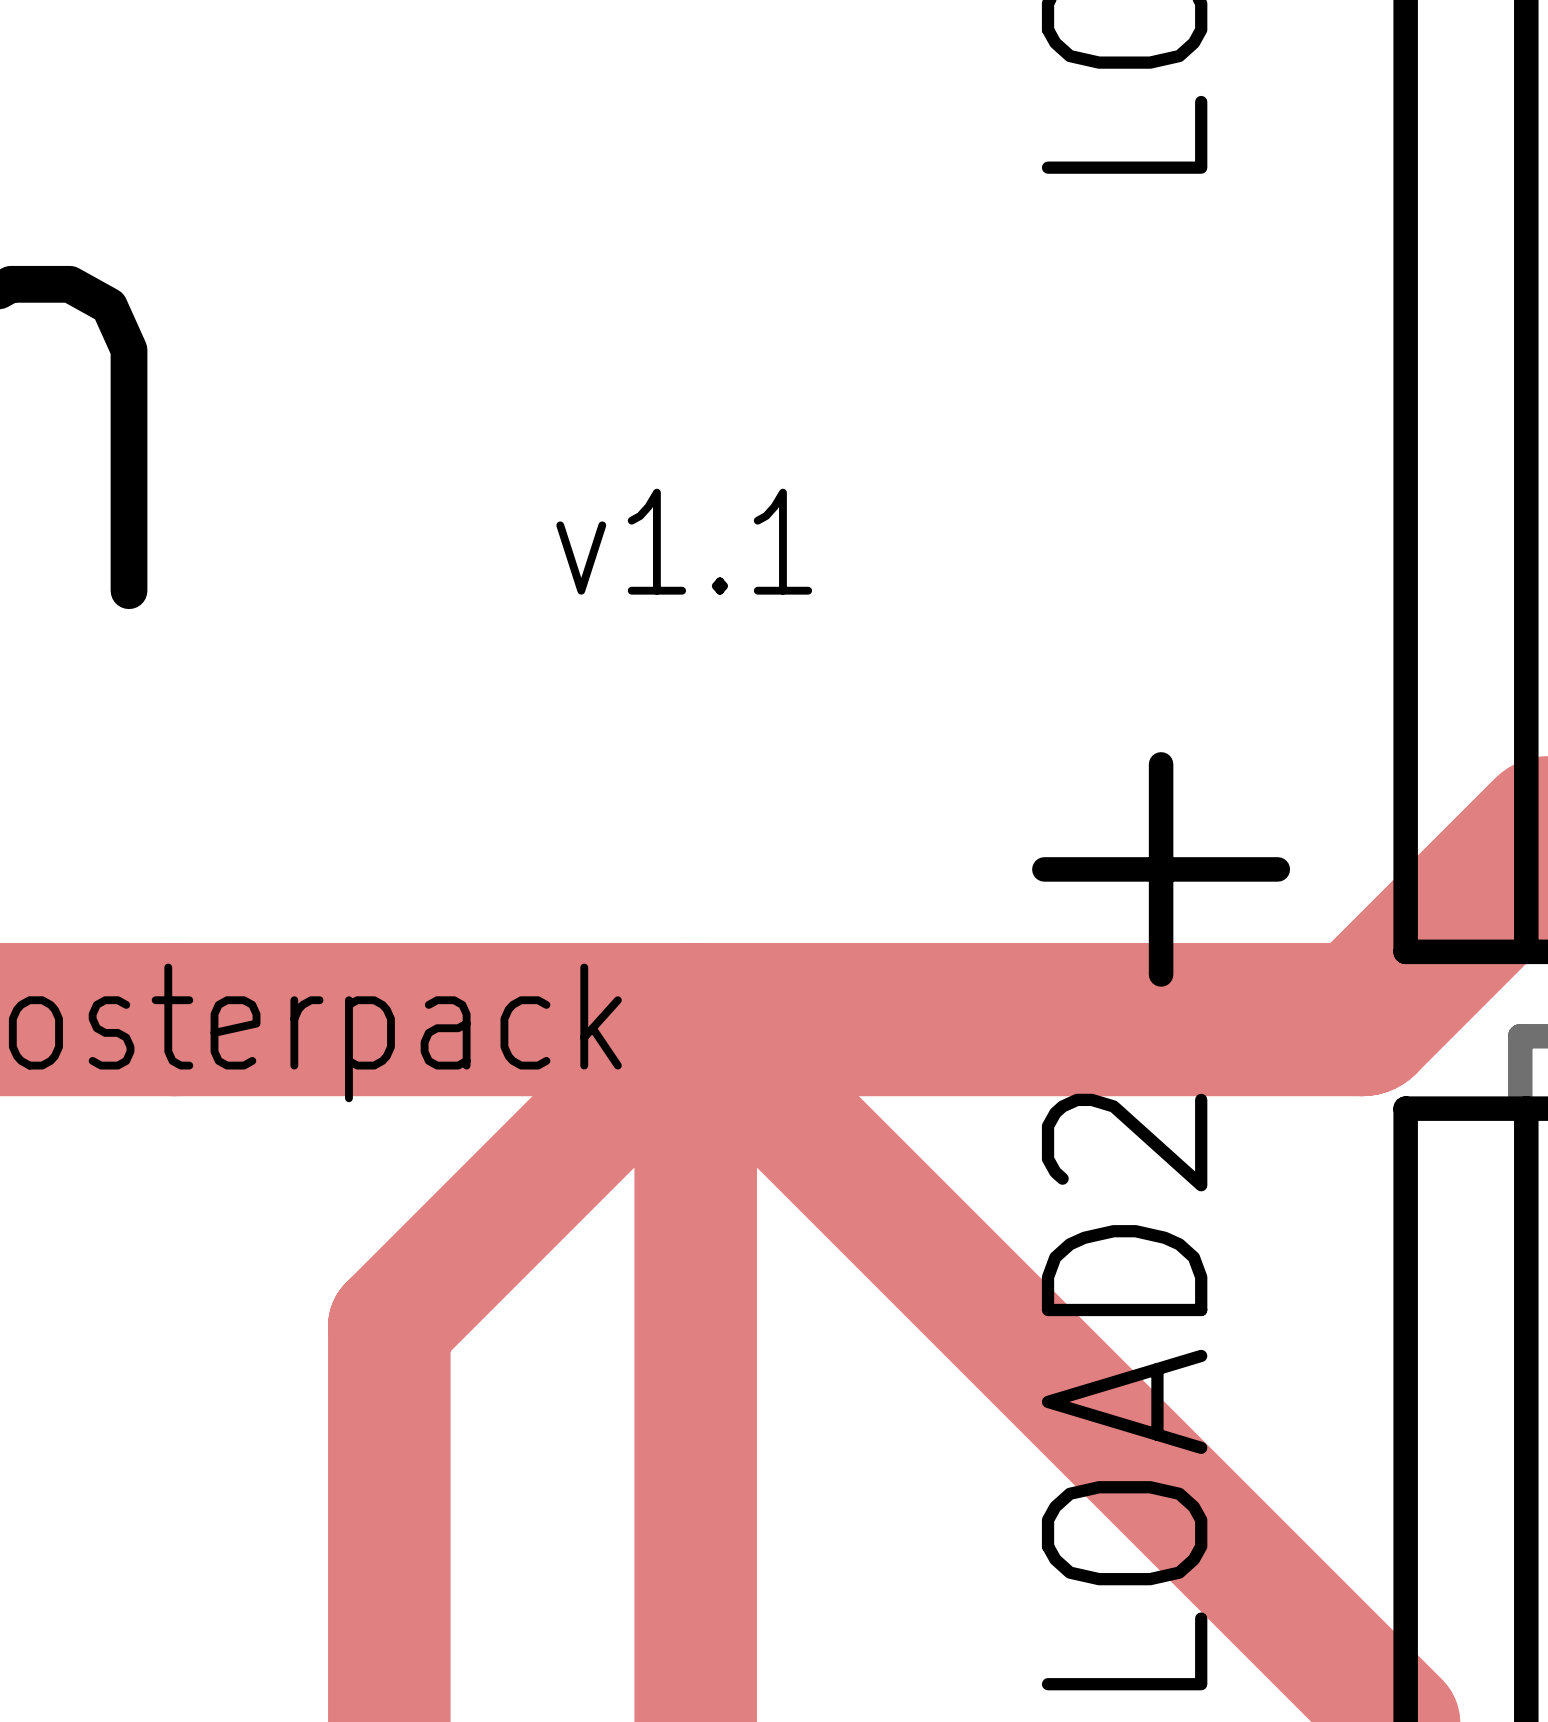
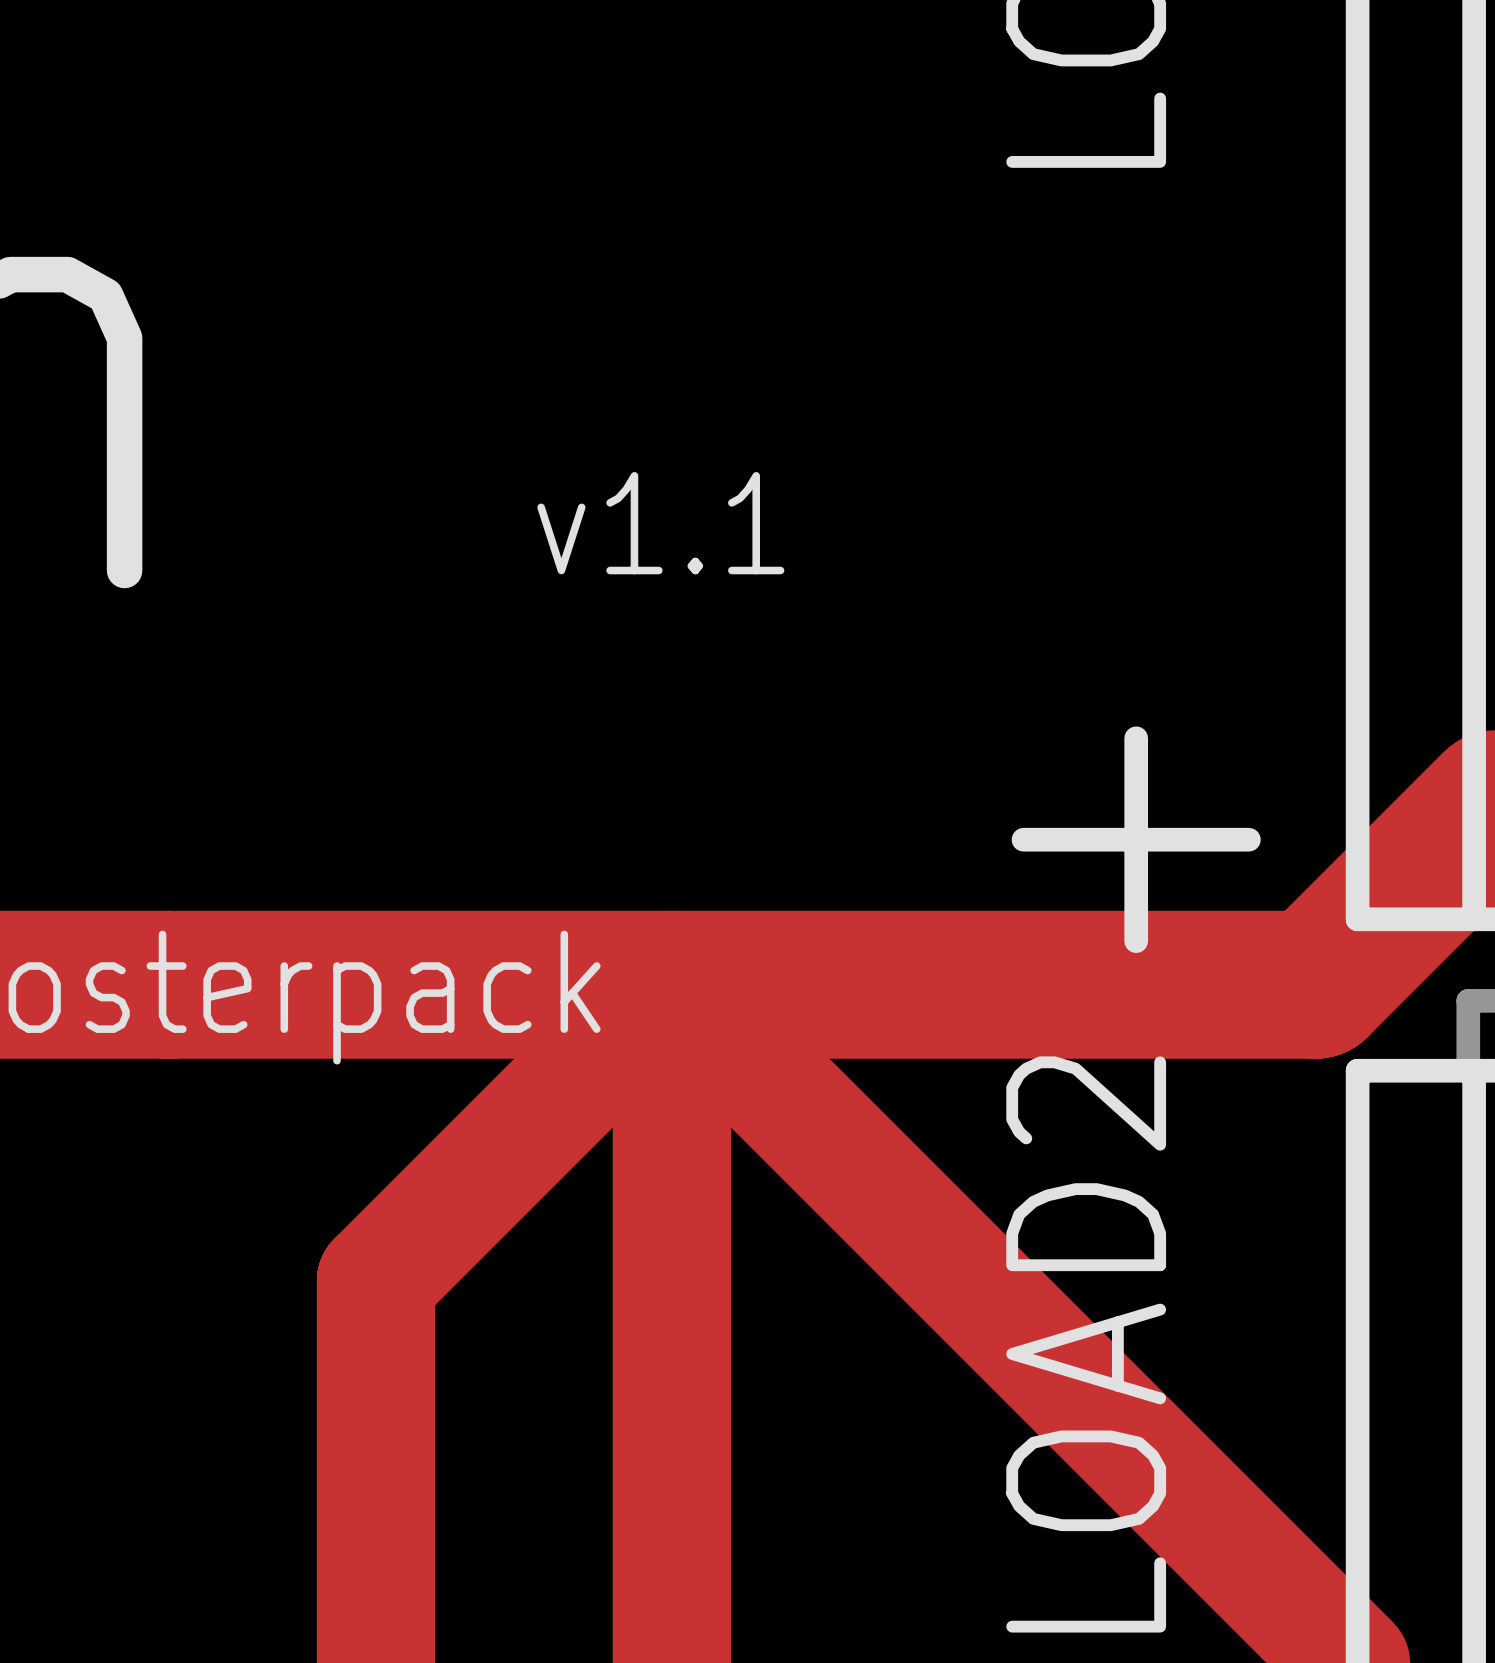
text position: + (1161, 869) -> + (1136, 839)

